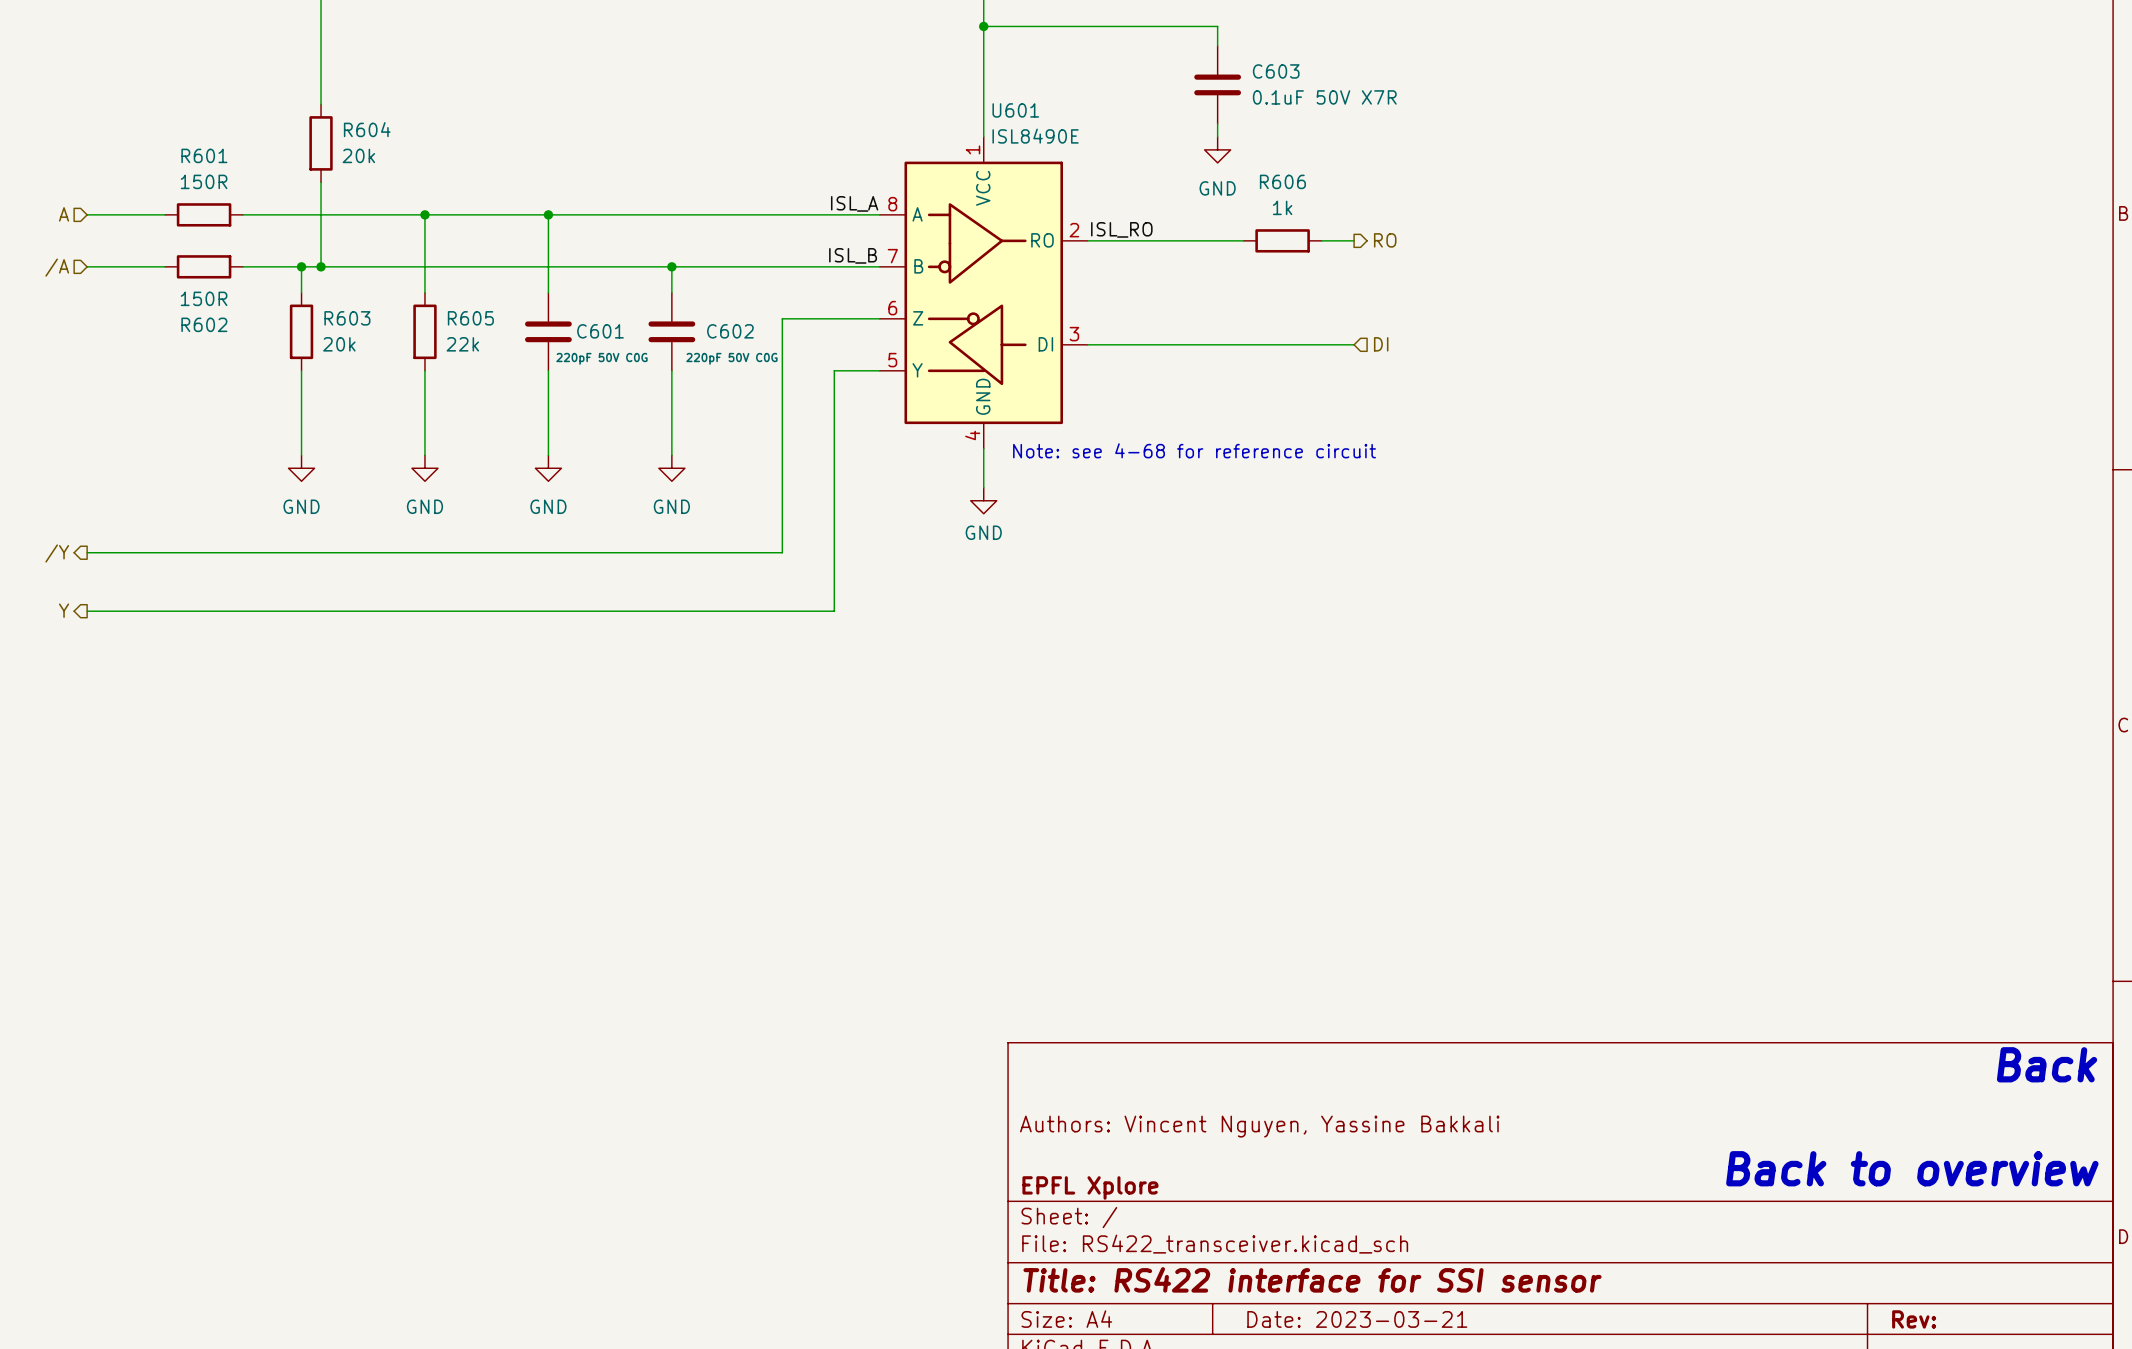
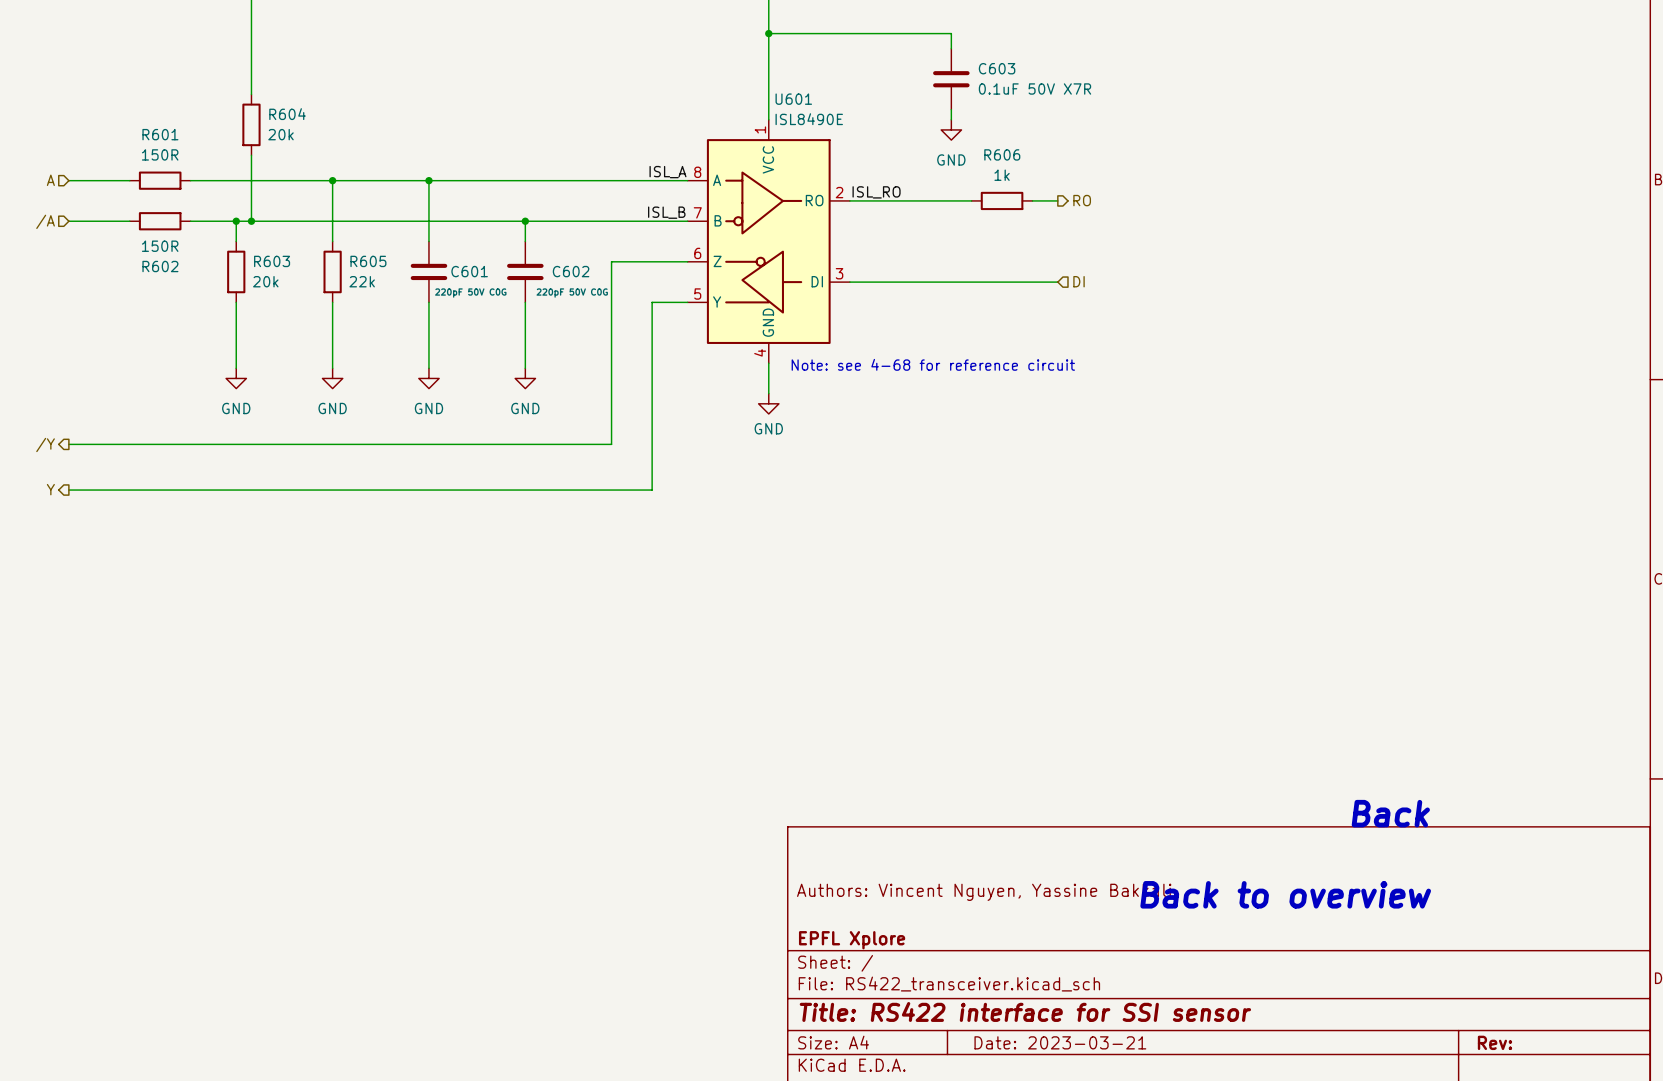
text: none -> Back (1390, 813)
text: Back (2047, 1064) -> none
text: none -> Back to overview (1285, 894)
text: Back to overview (1912, 1168) -> none

